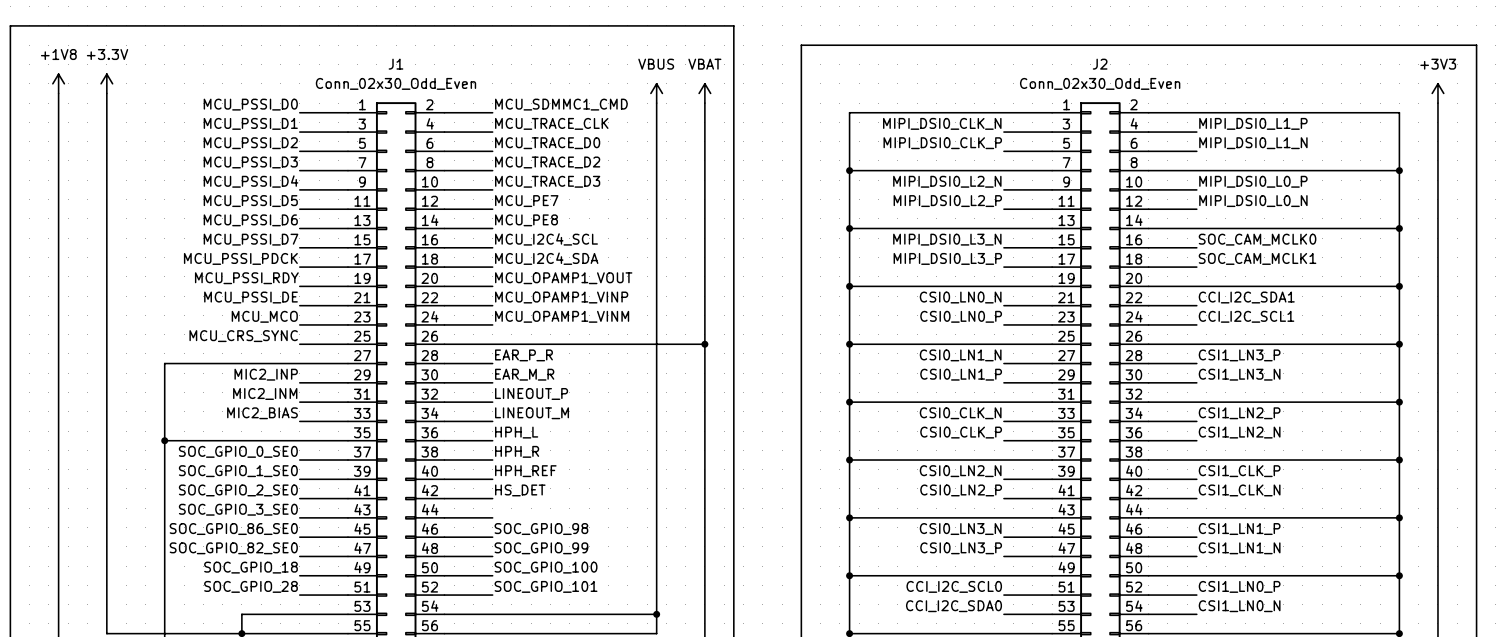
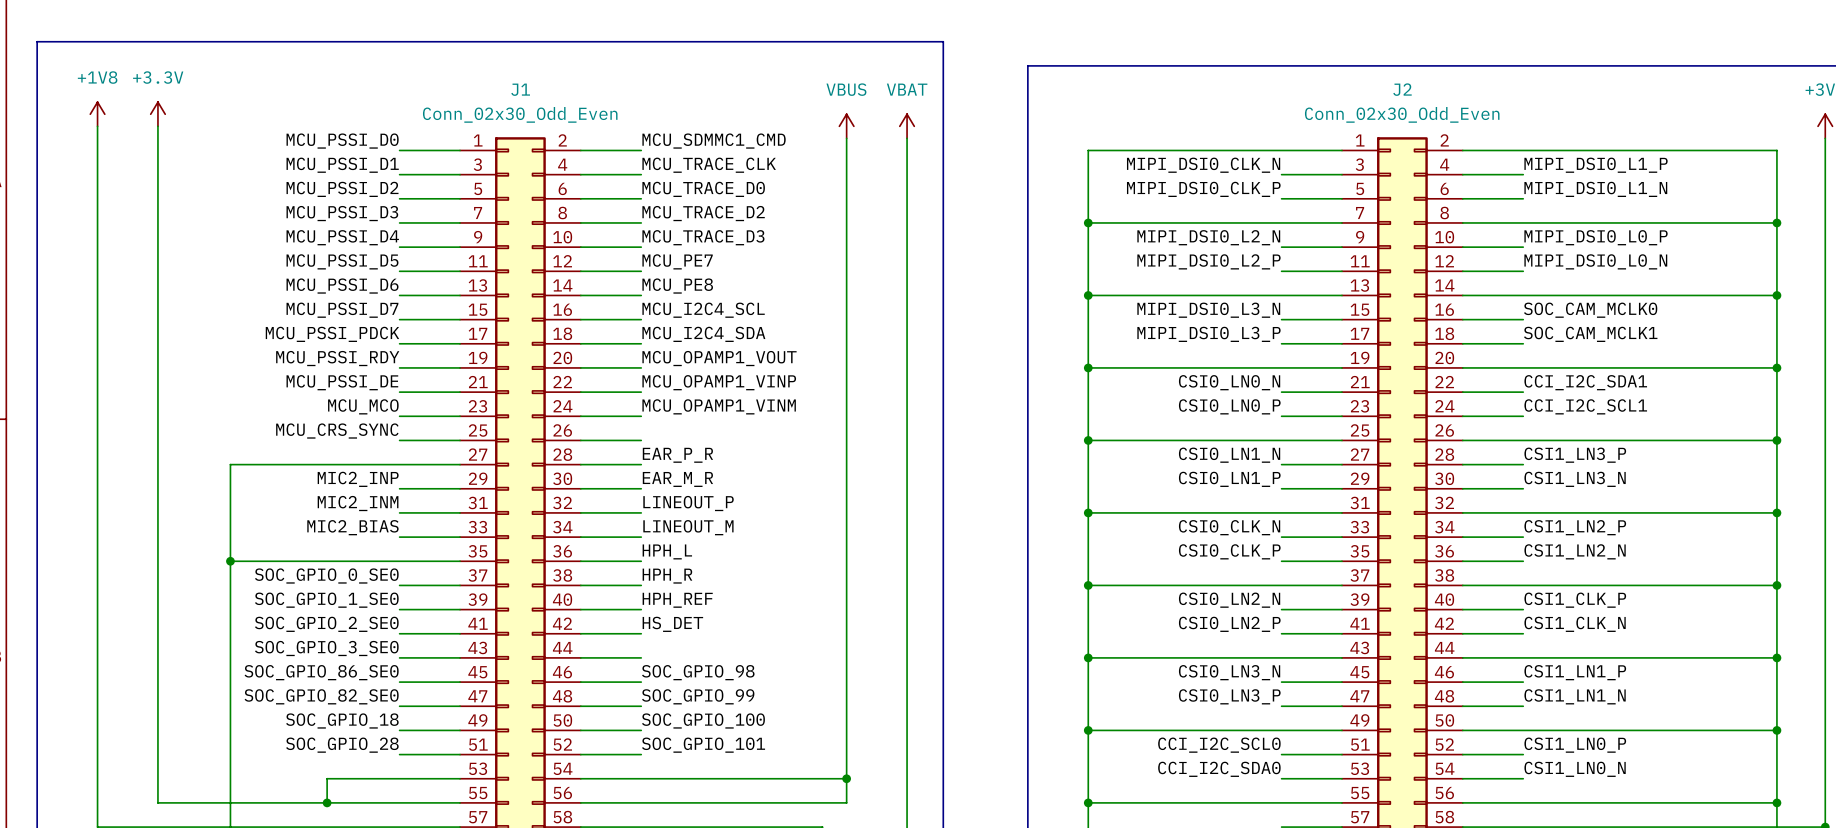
wire: (492, 344) (704, 344) -> none
junction: (704, 344) -> none

